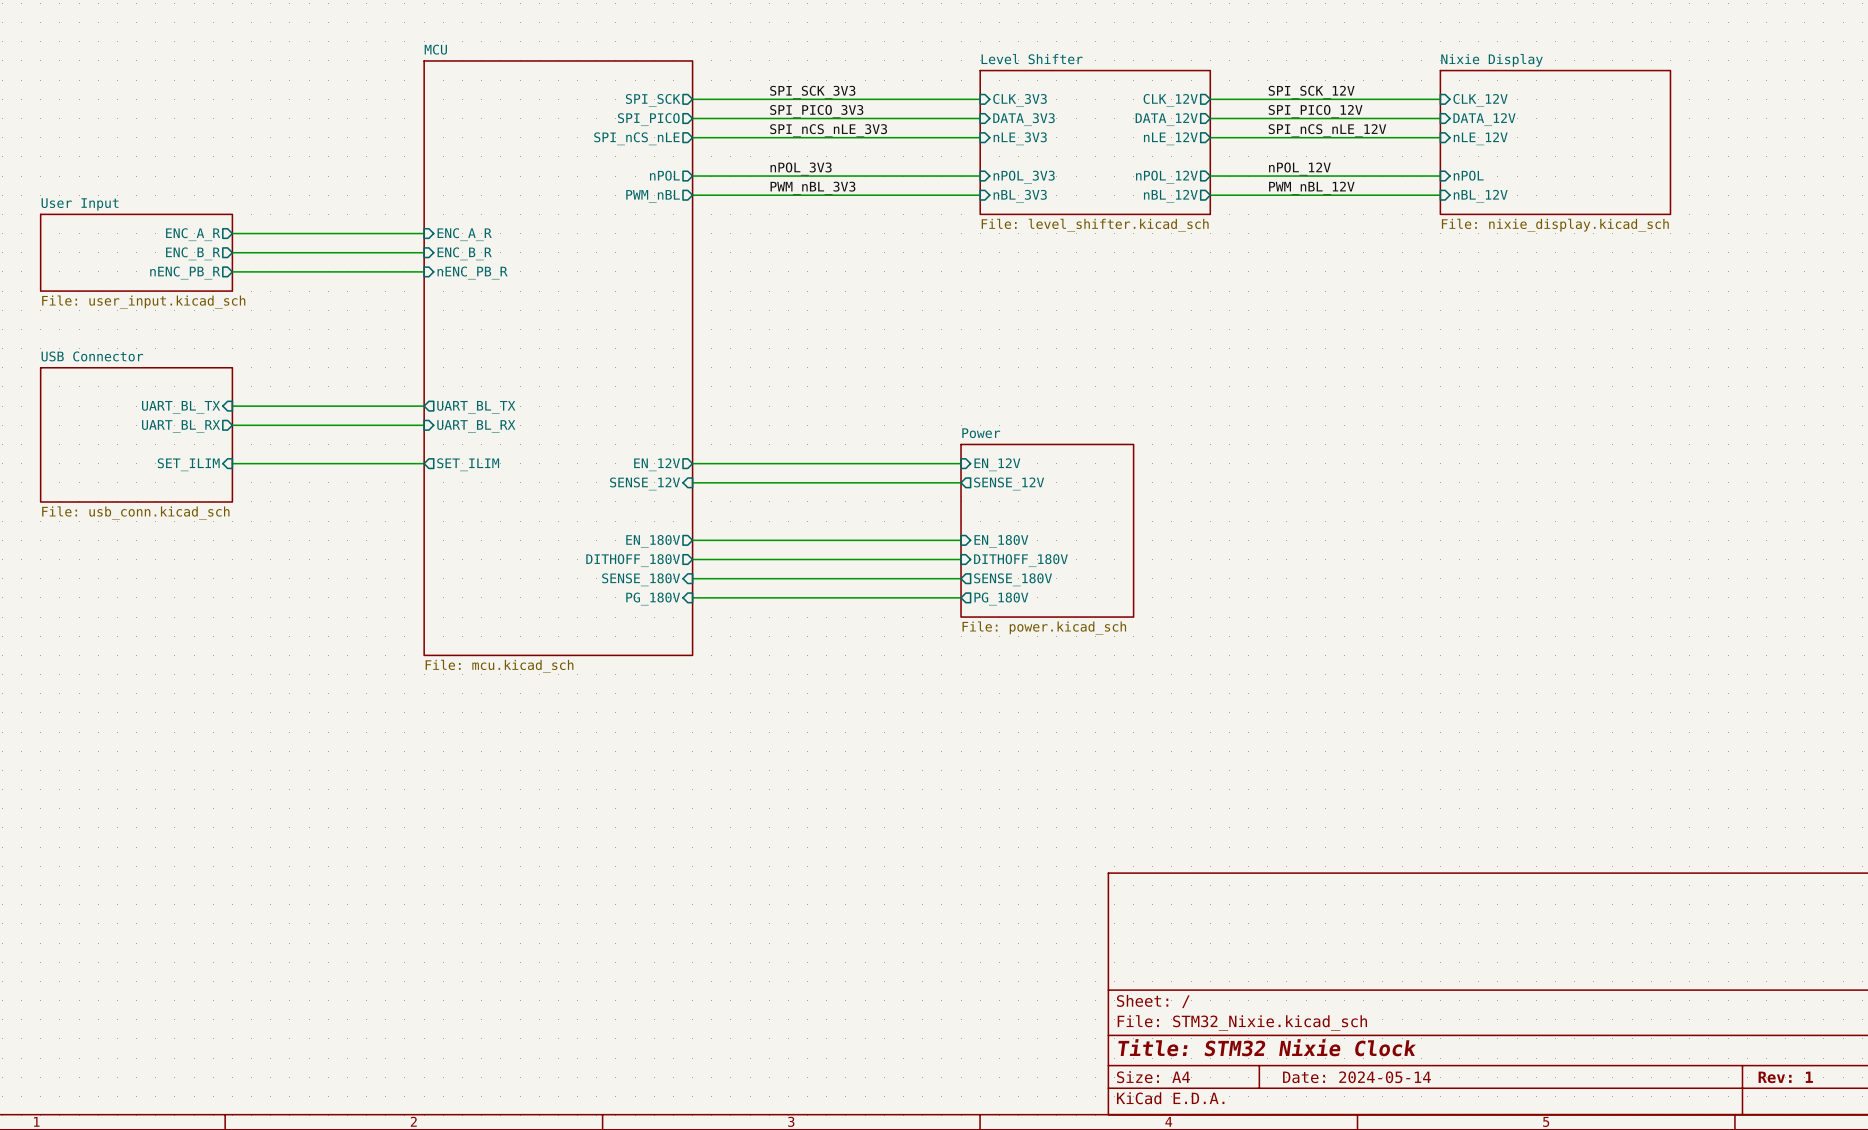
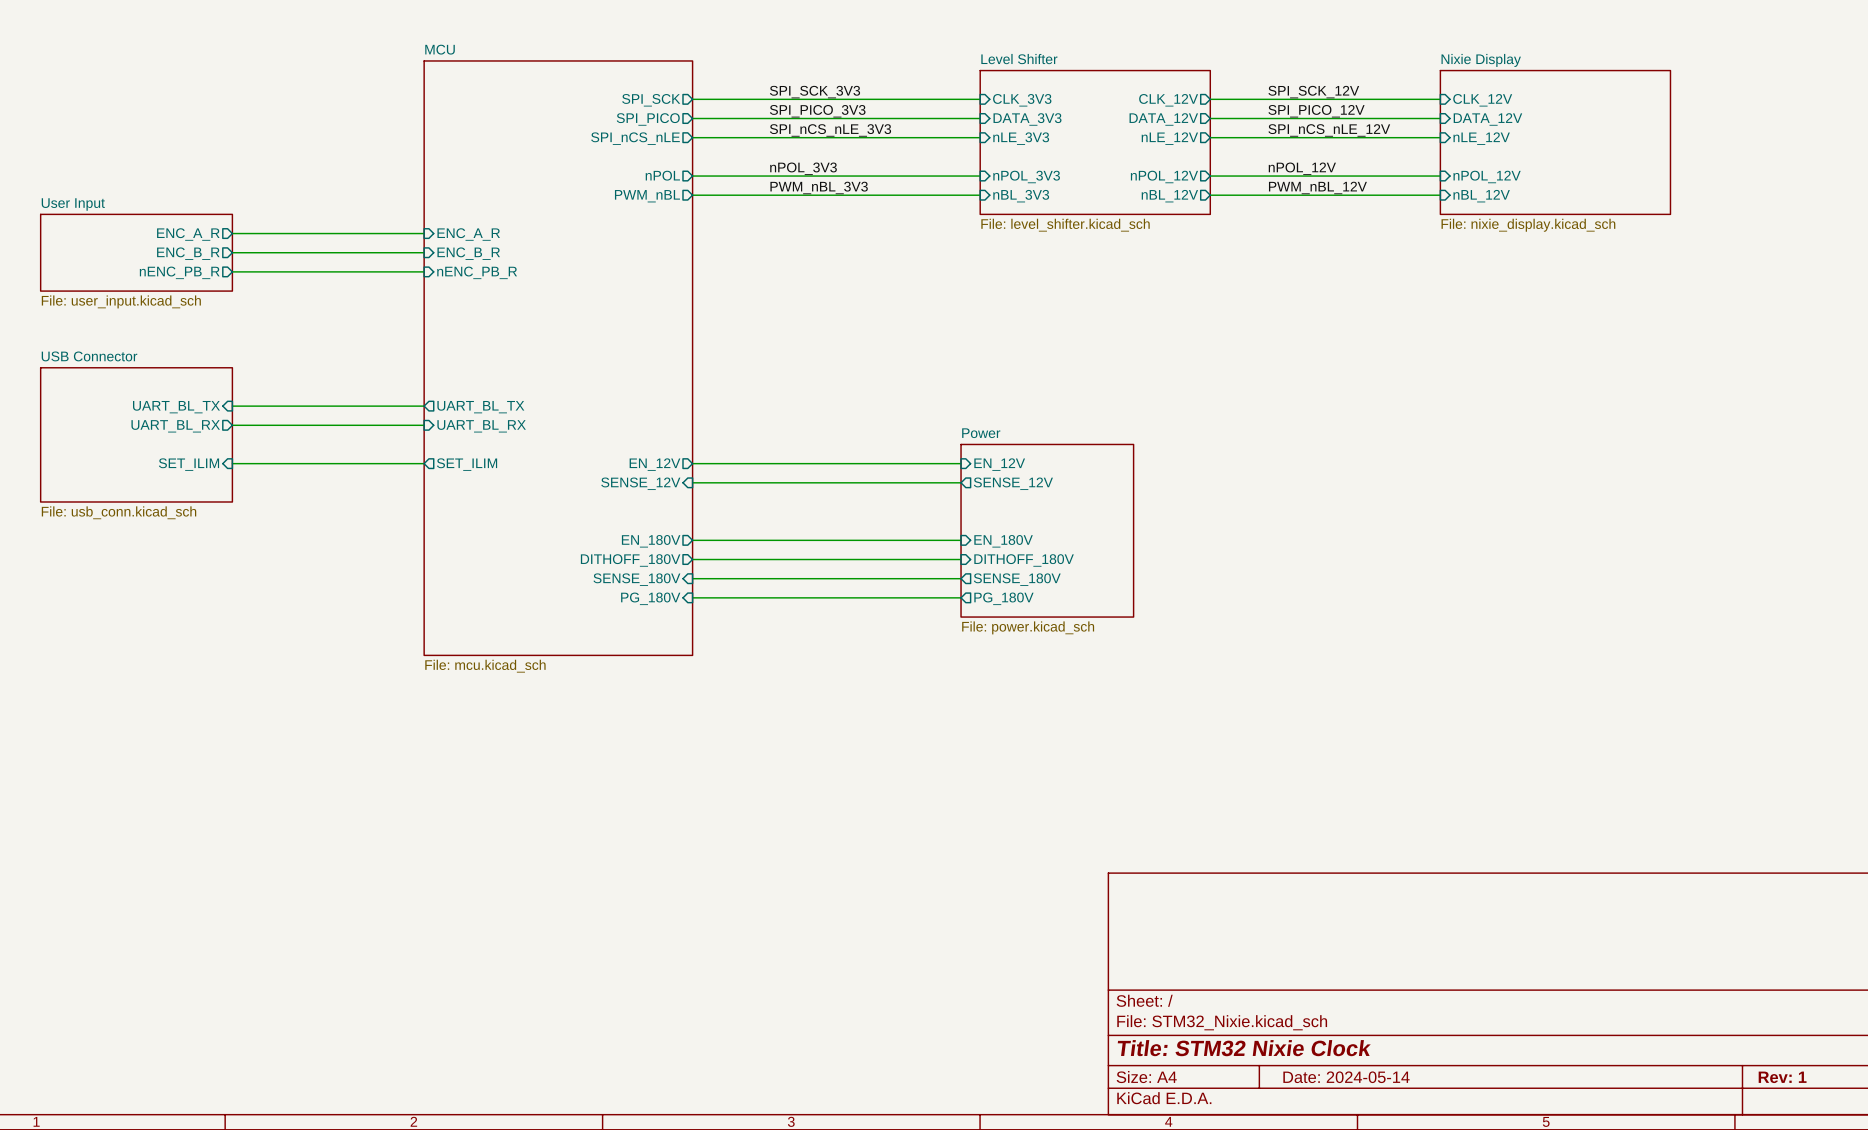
sheet pin: nPOL (1468, 175) -> nPOL_12V (1487, 176)

